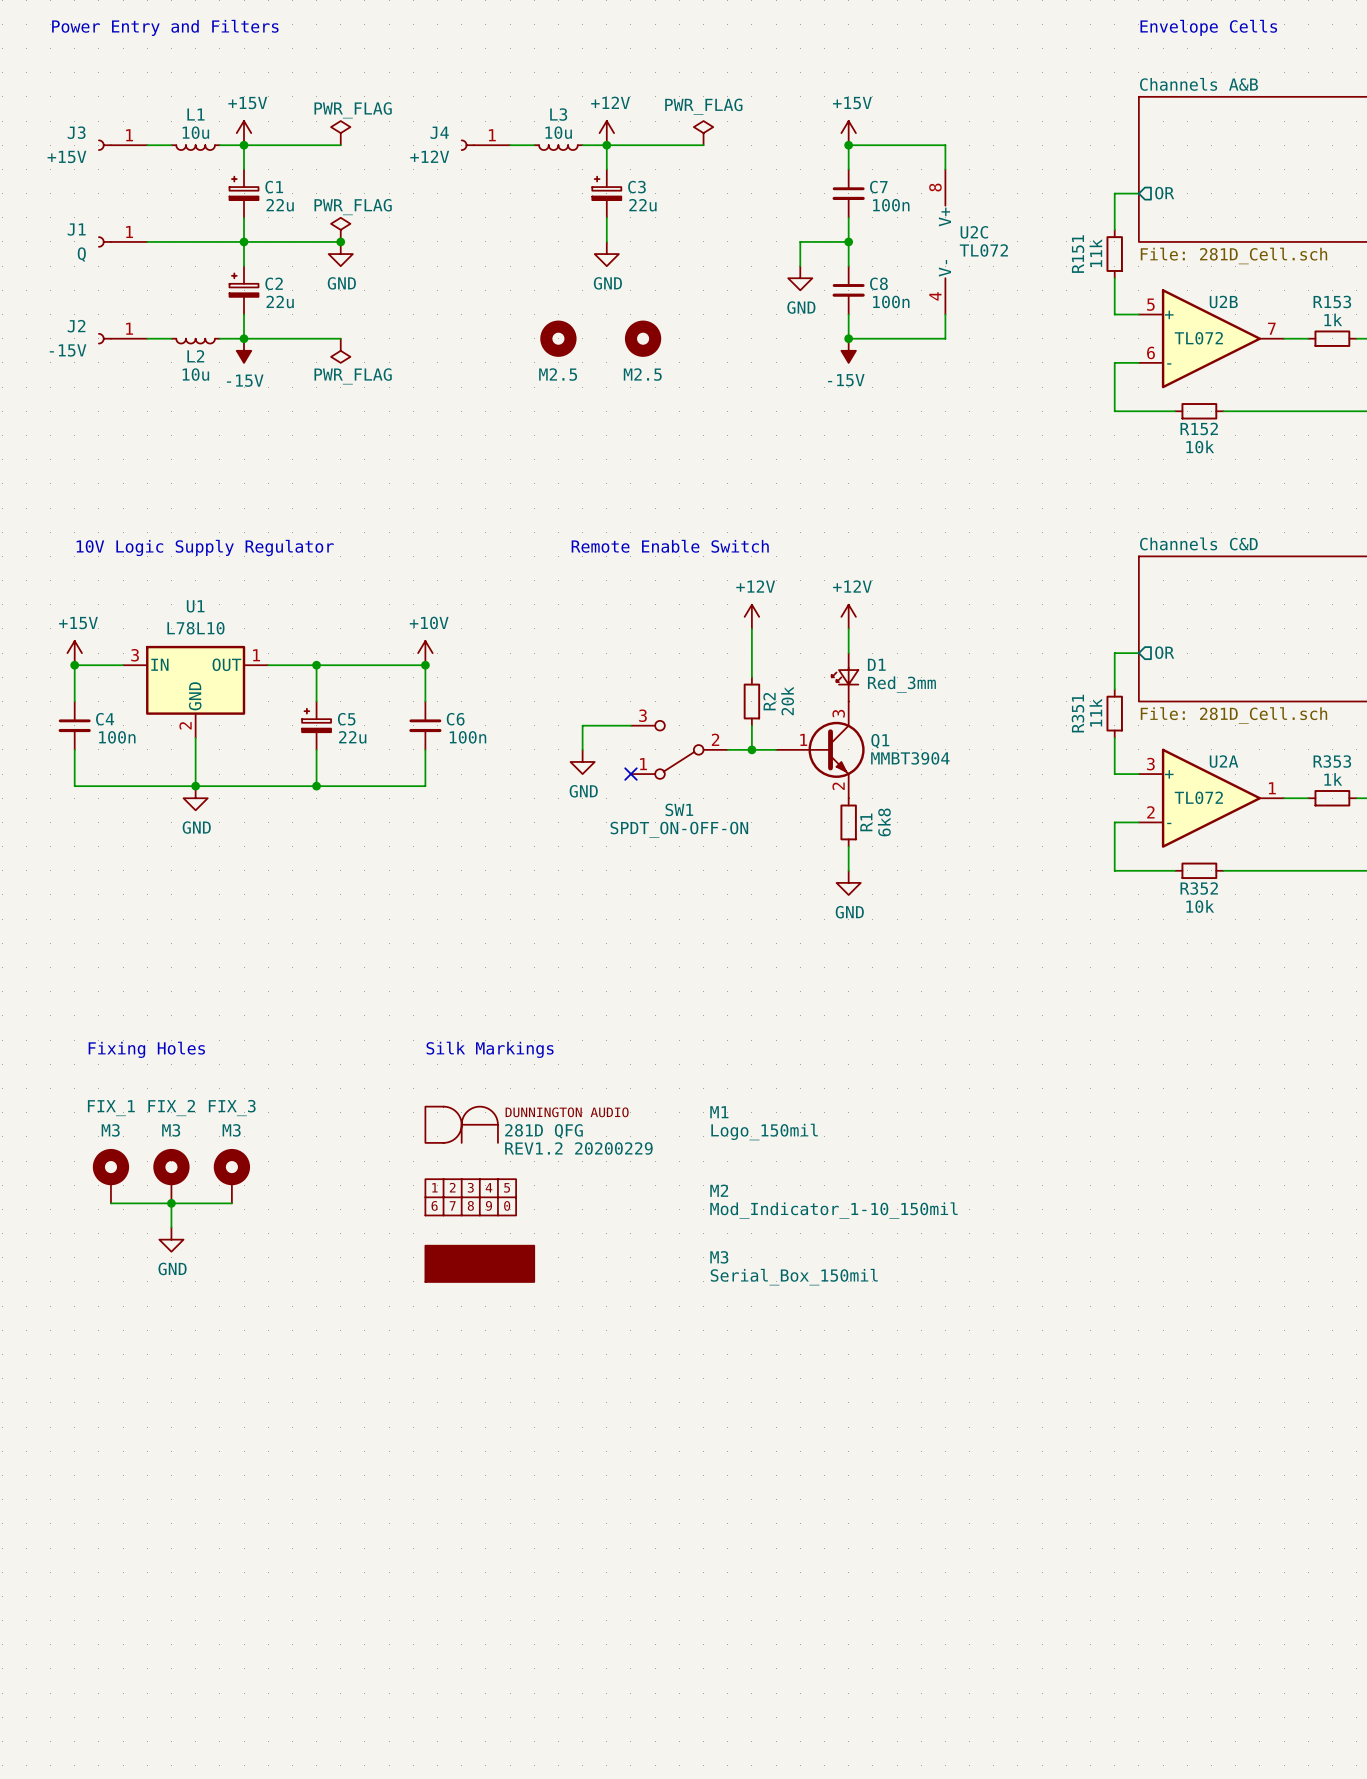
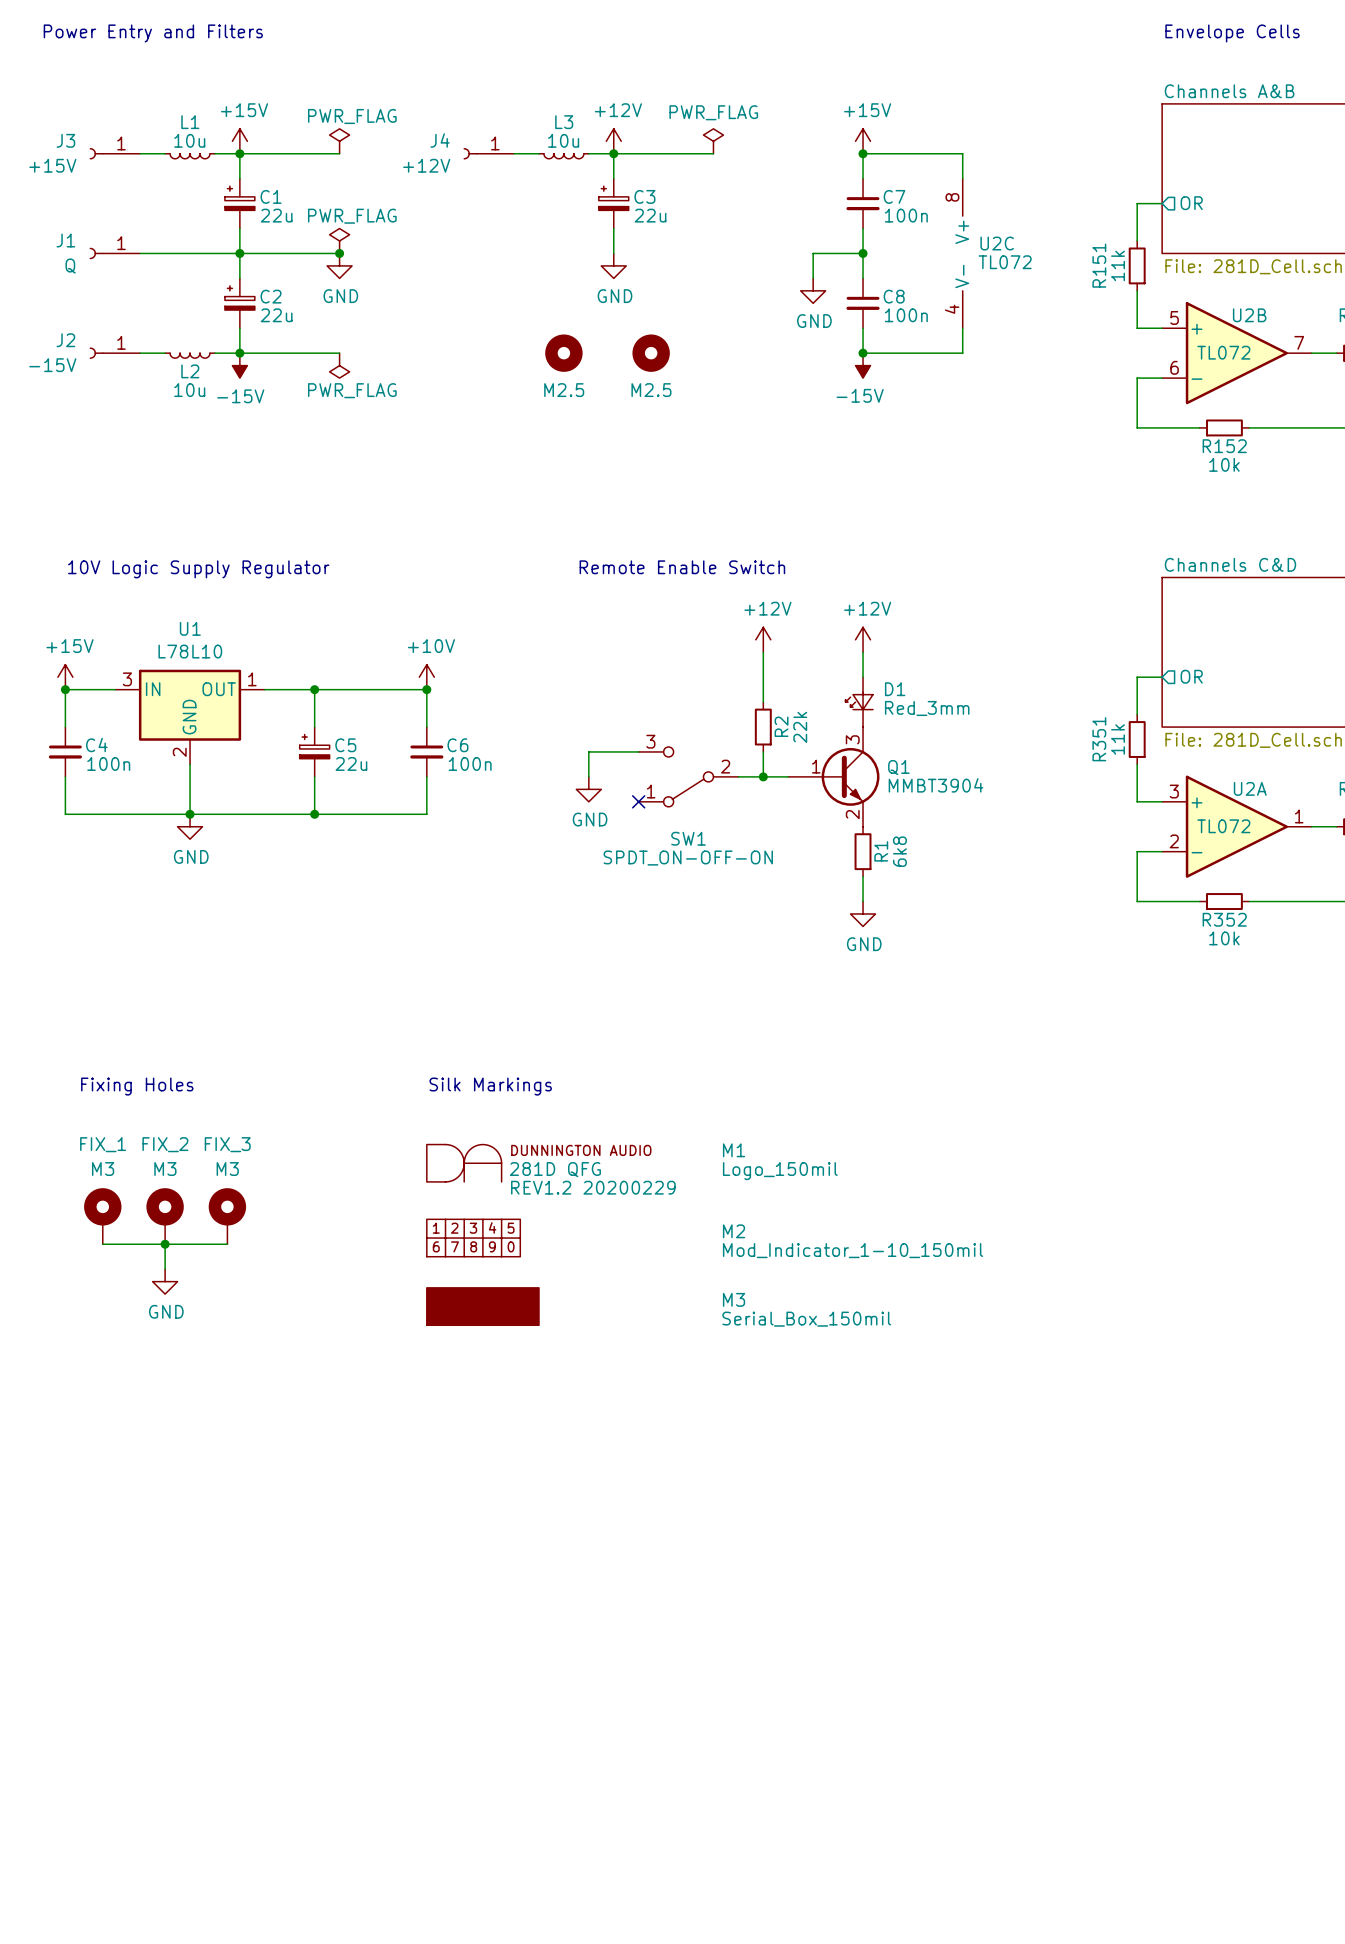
R2 value: 20k (787, 701) -> 22k (800, 727)

